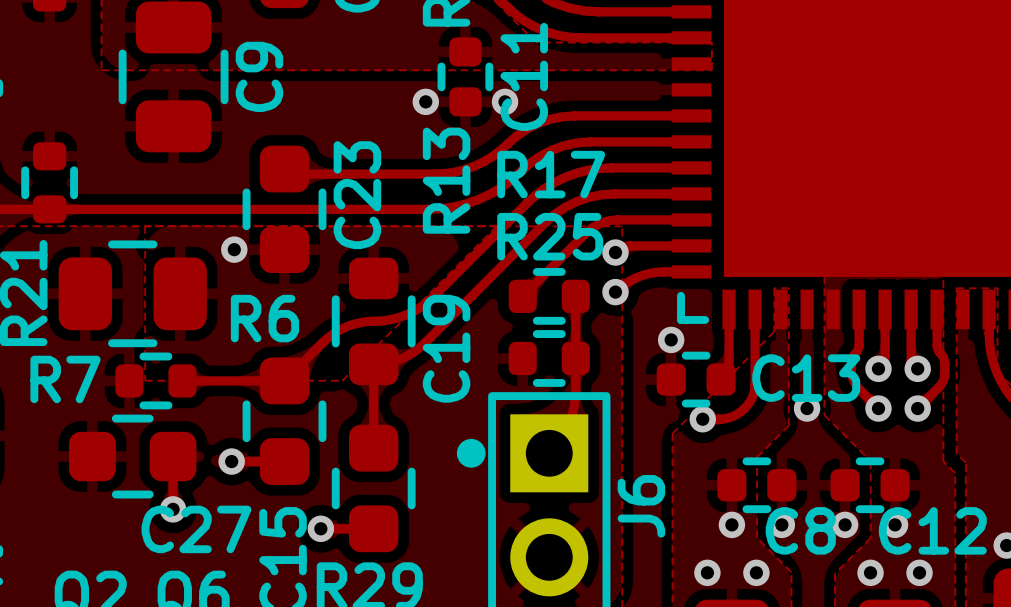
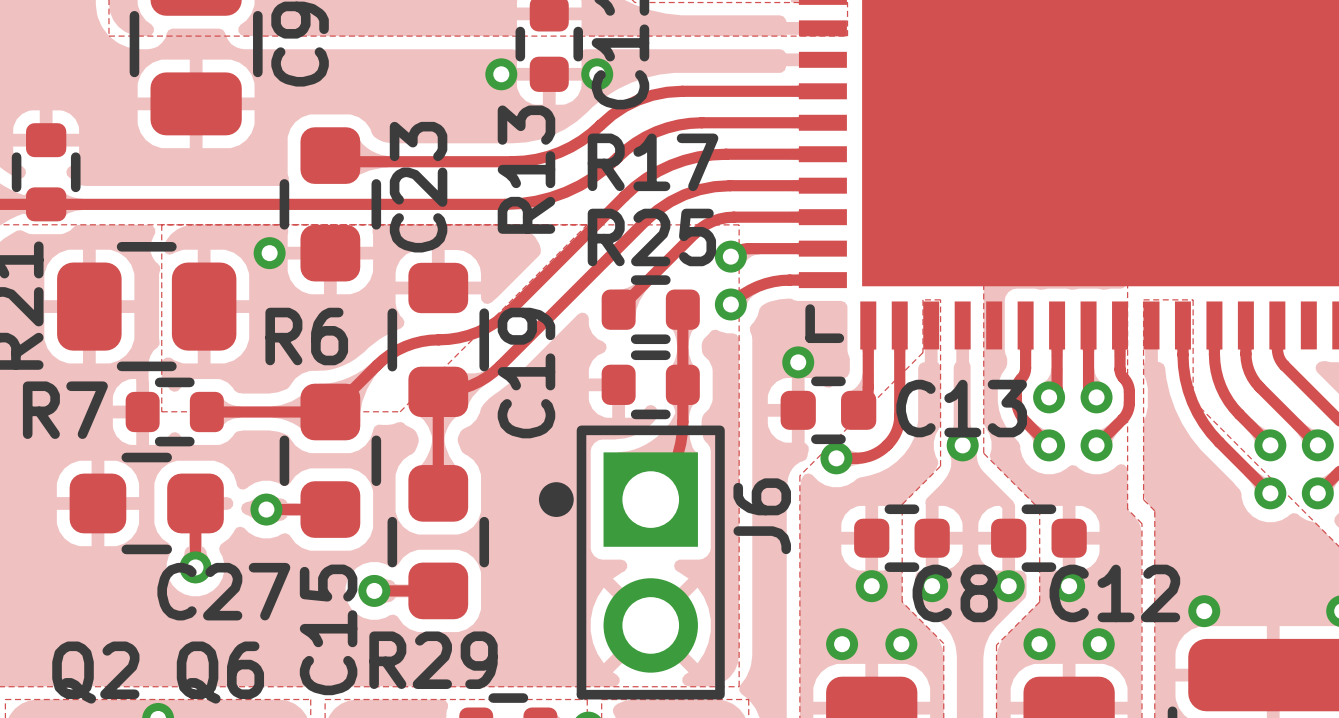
J6 name position: J6 (641, 506) -> J6 (762, 516)

